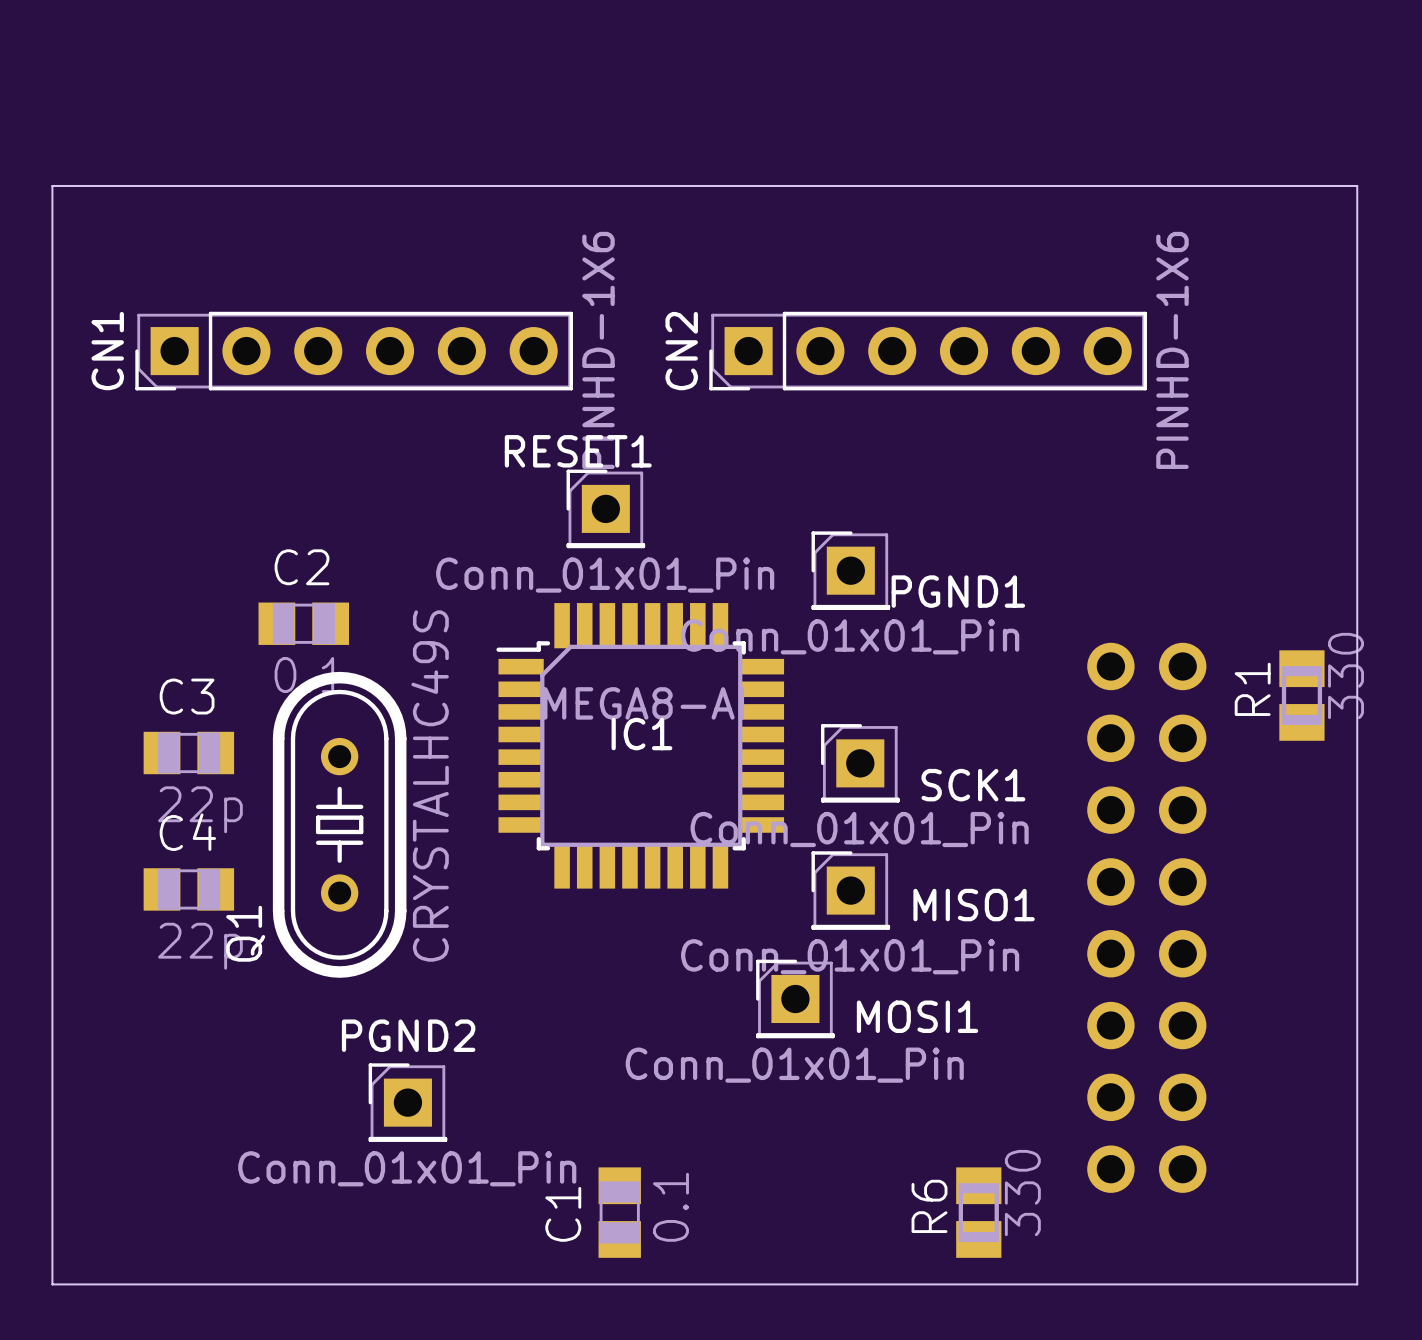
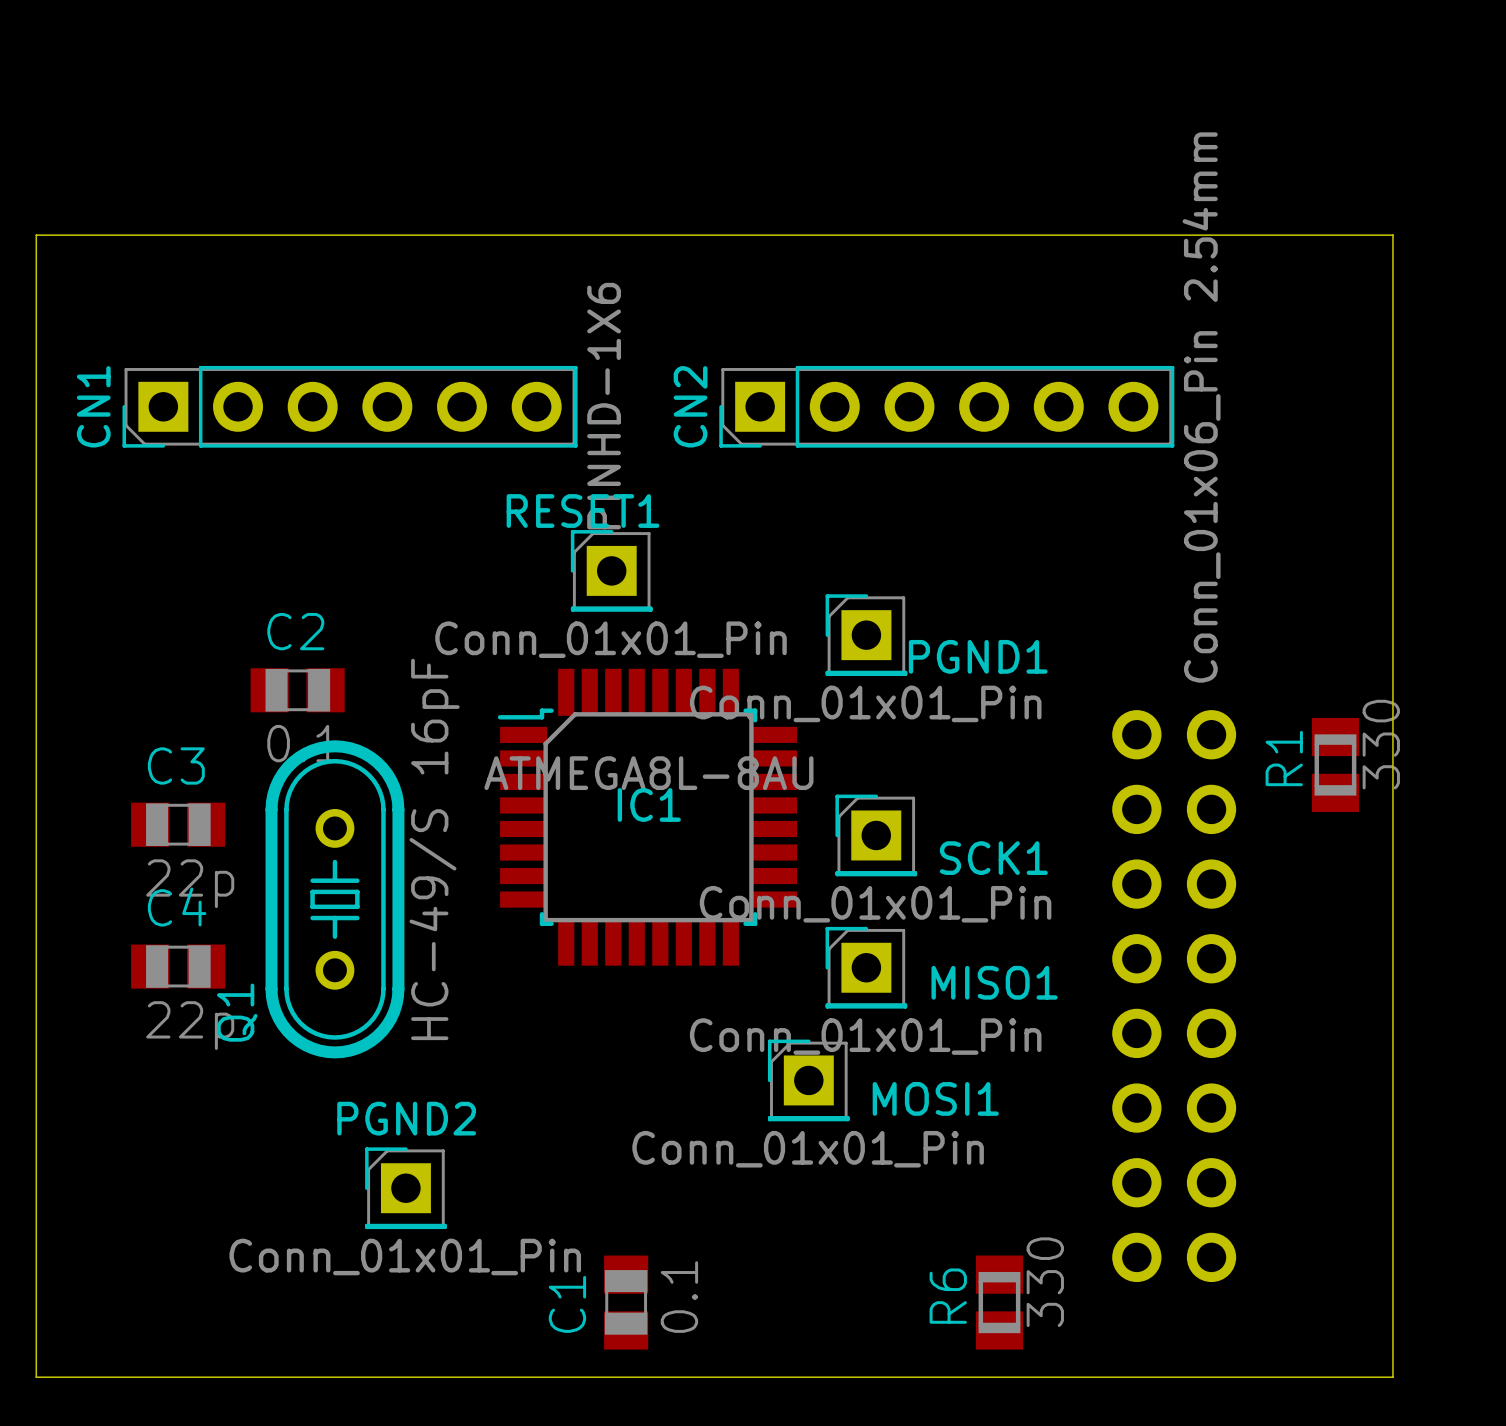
CN2 value: PINHD-1X6 (1172, 350) -> Conn_01x06_Pin 2.54mm (1201, 407)
IC1 value: MEGA8-AI (643, 703) -> ATMEGA8L-8AU (648, 773)
Q1 value: CRYSTALHC49S (430, 786) -> HC-49/S 16pF (434, 849)

